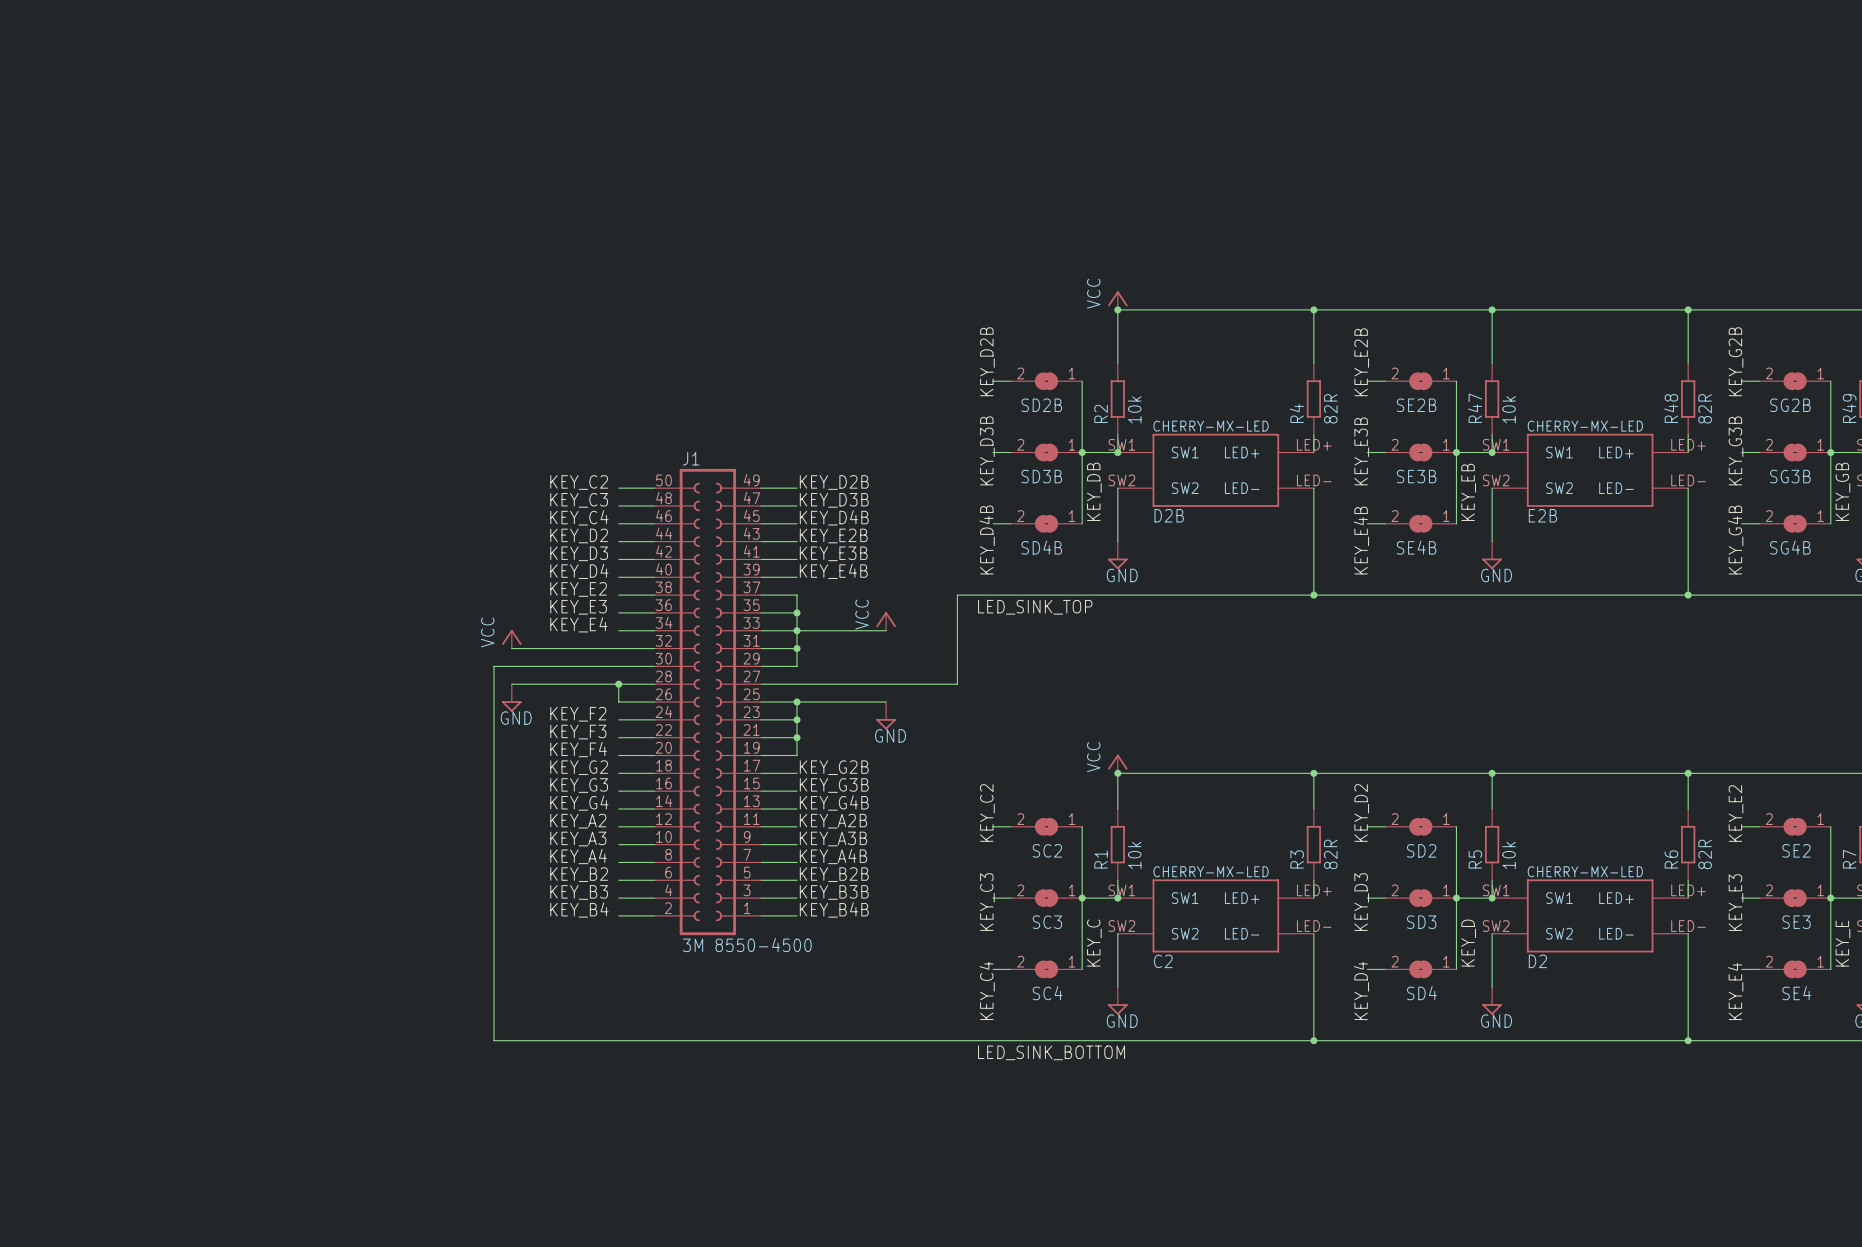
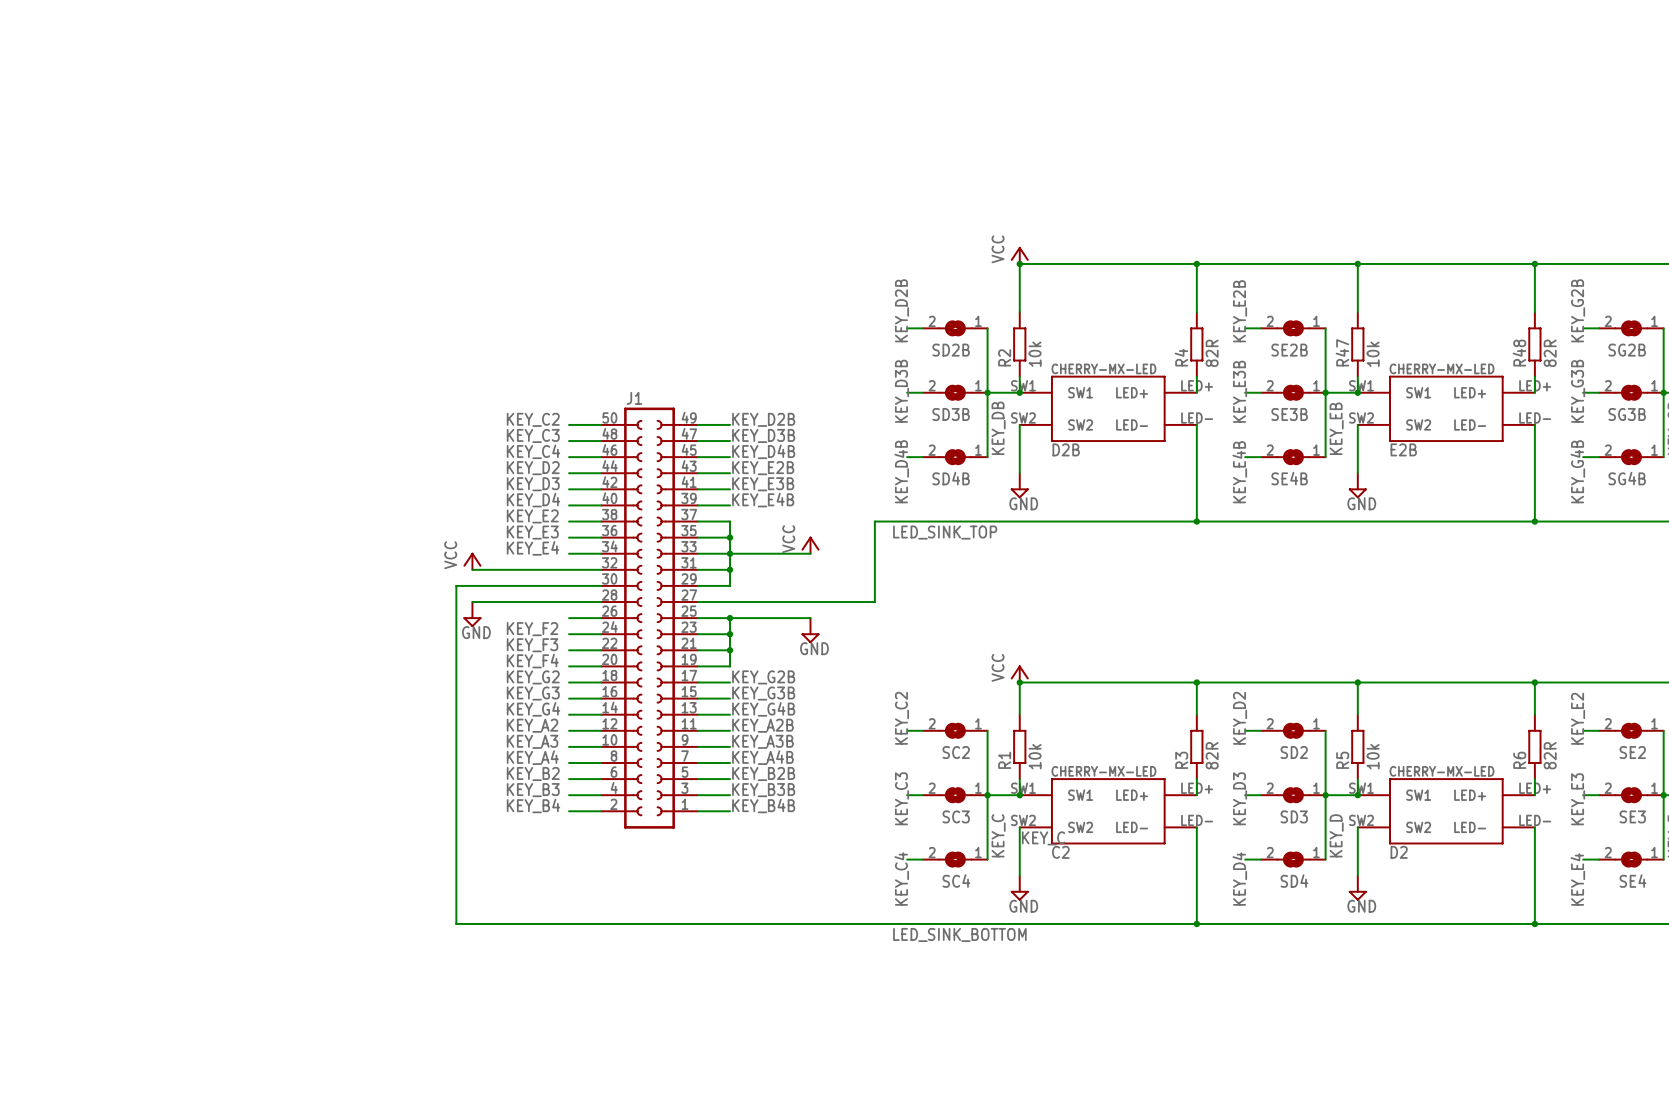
wire: (618, 684) (618, 702) -> none
junction: (618, 684) -> none
J1 value: 3M 8550-4500 (747, 945) -> none
label: none -> KEY_C (1043, 838)

